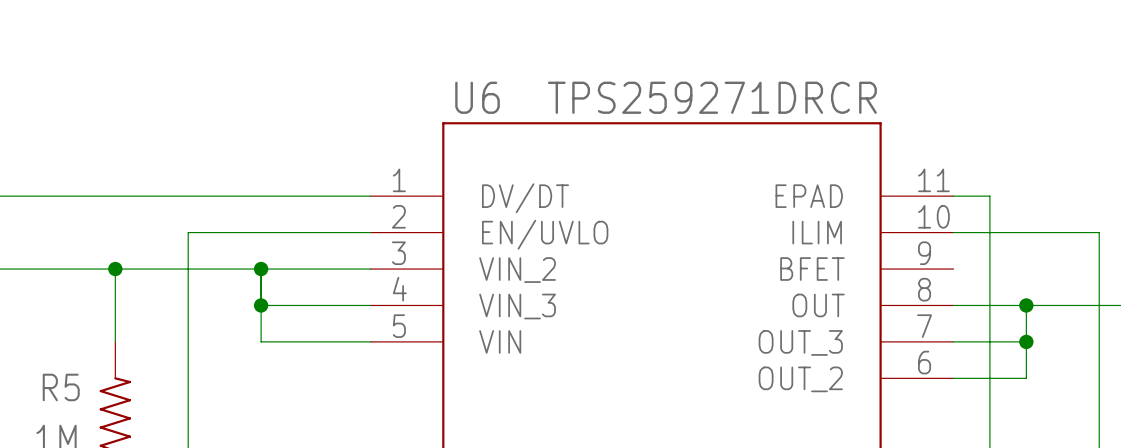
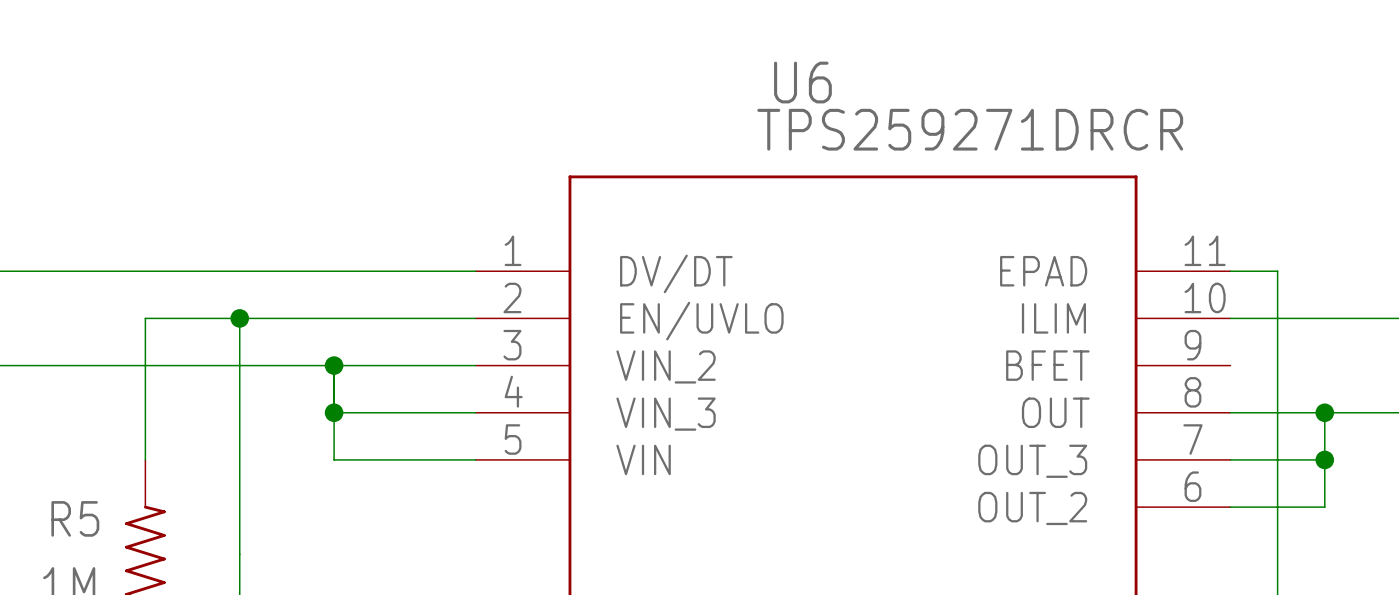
U6 name position: U6 (477, 97) -> U6 (802, 82)
U6 value position: TPS259271DRCR (712, 97) -> TPS259271DRCR (970, 129)
wire: none -> (239, 318) (145, 318) (145, 365)
junction position: (115, 269) -> (239, 318)

